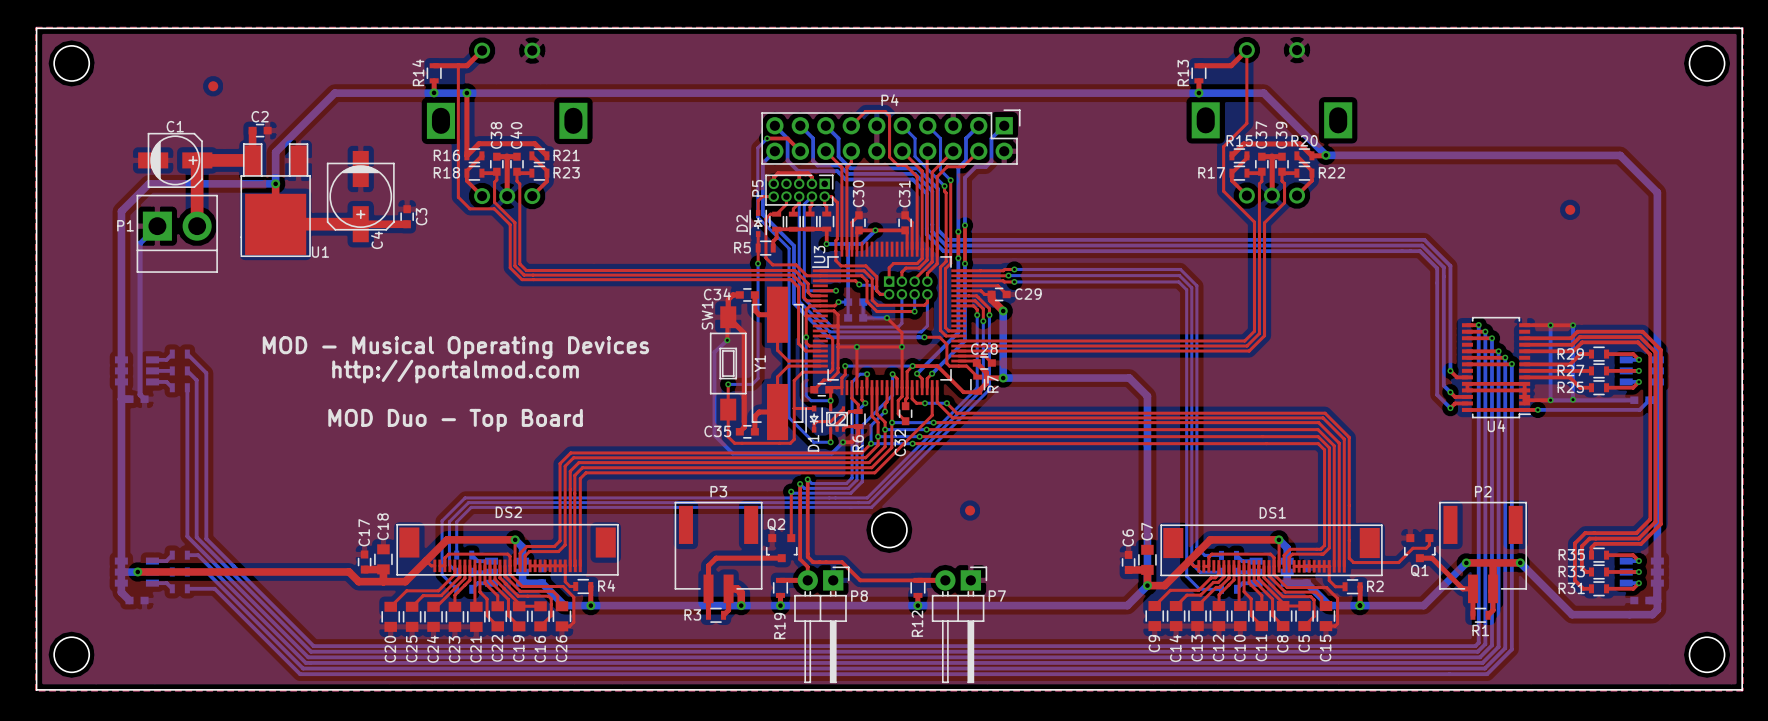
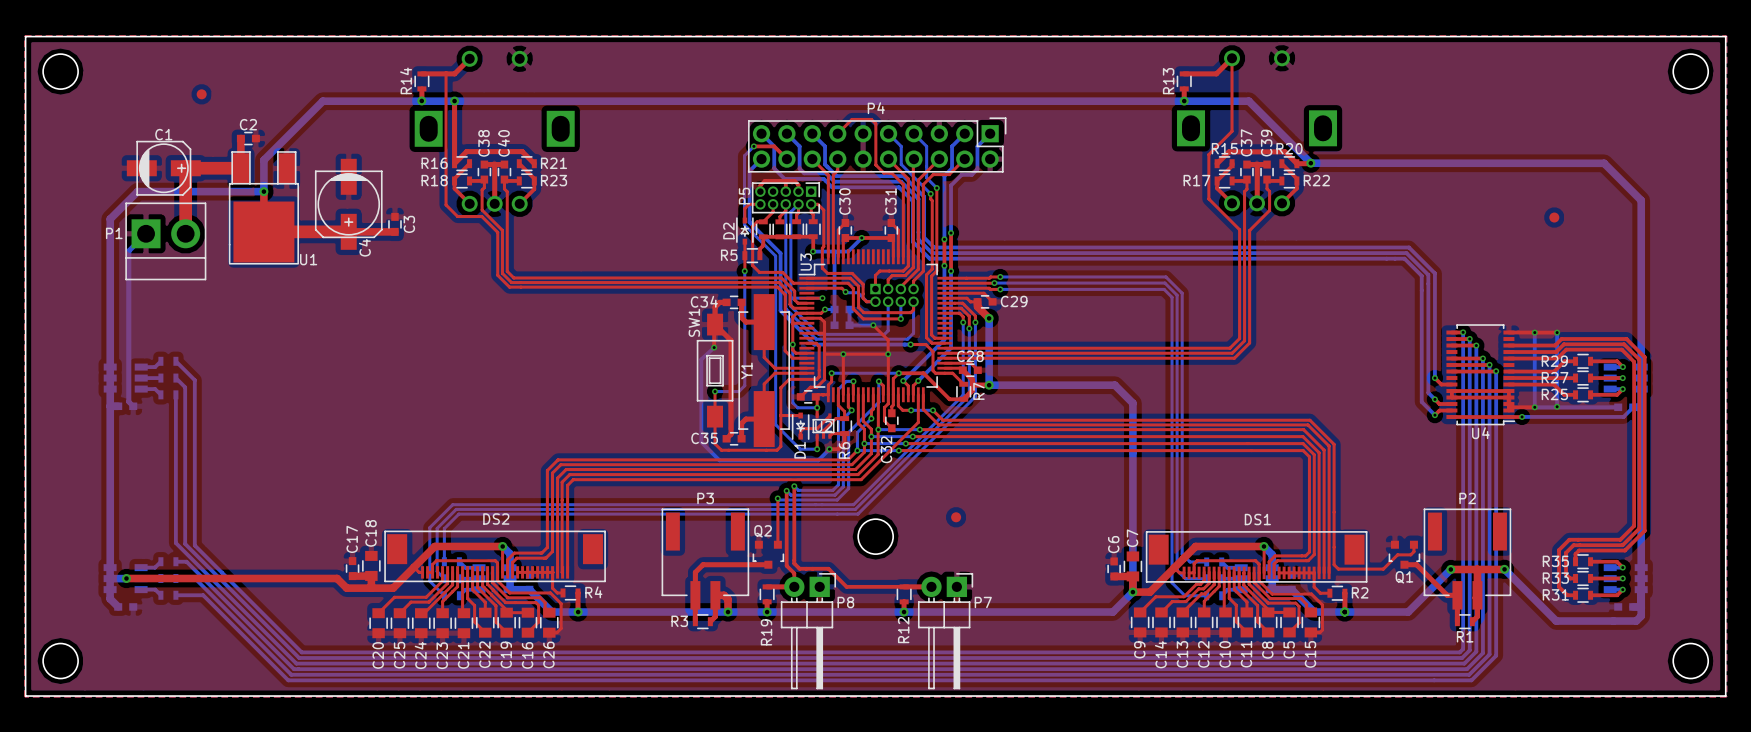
text: MOD - Musical Operating Devices (455, 347) -> none
text: http://portalmod.com (455, 371) -> none
text: MOD Duo - Top Board (455, 420) -> none

